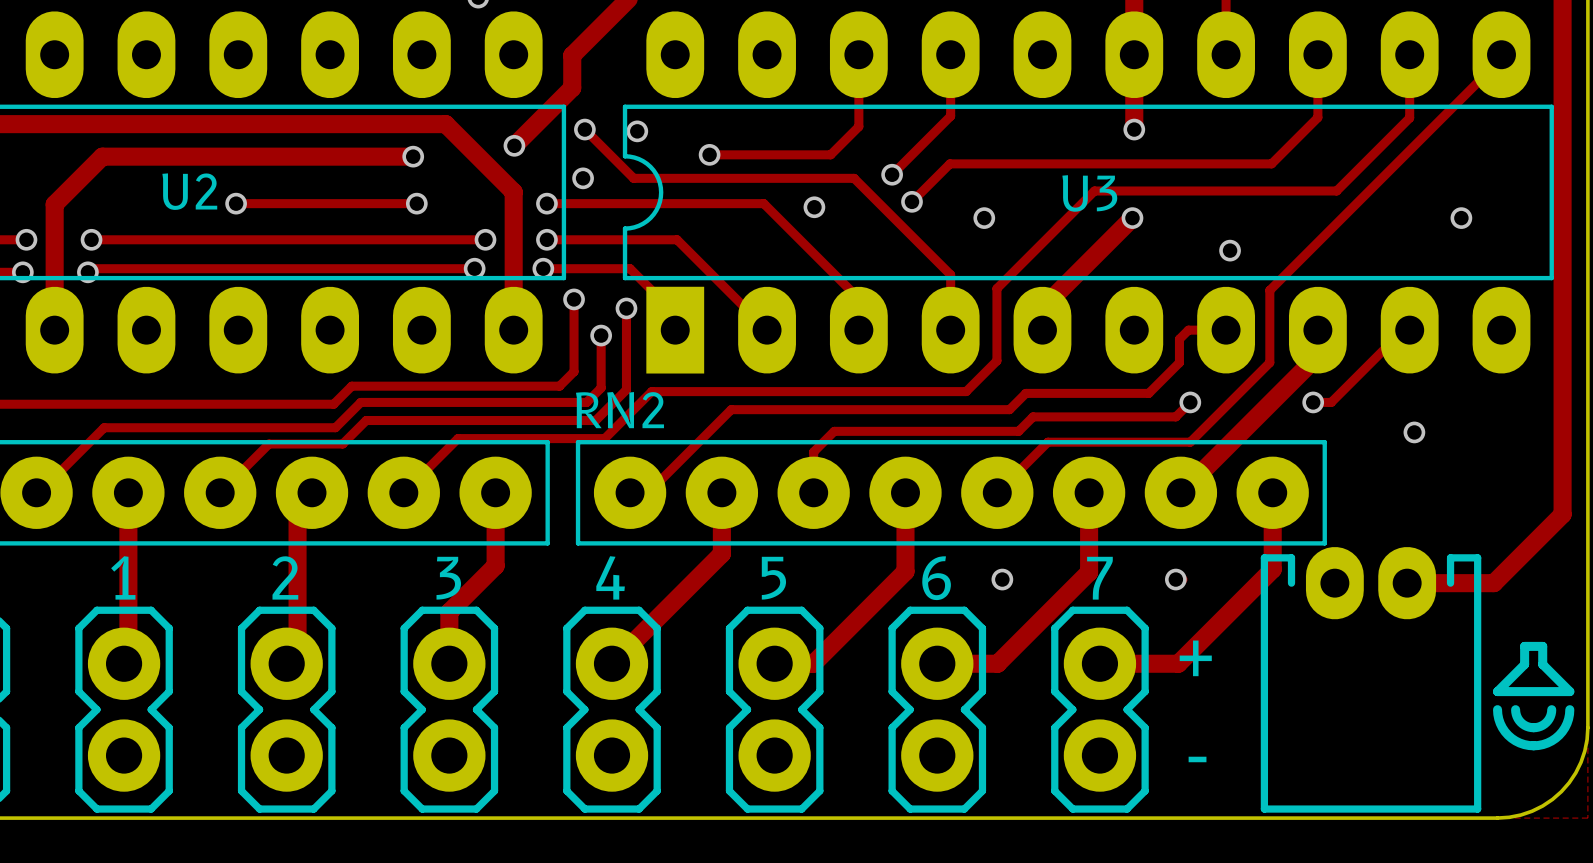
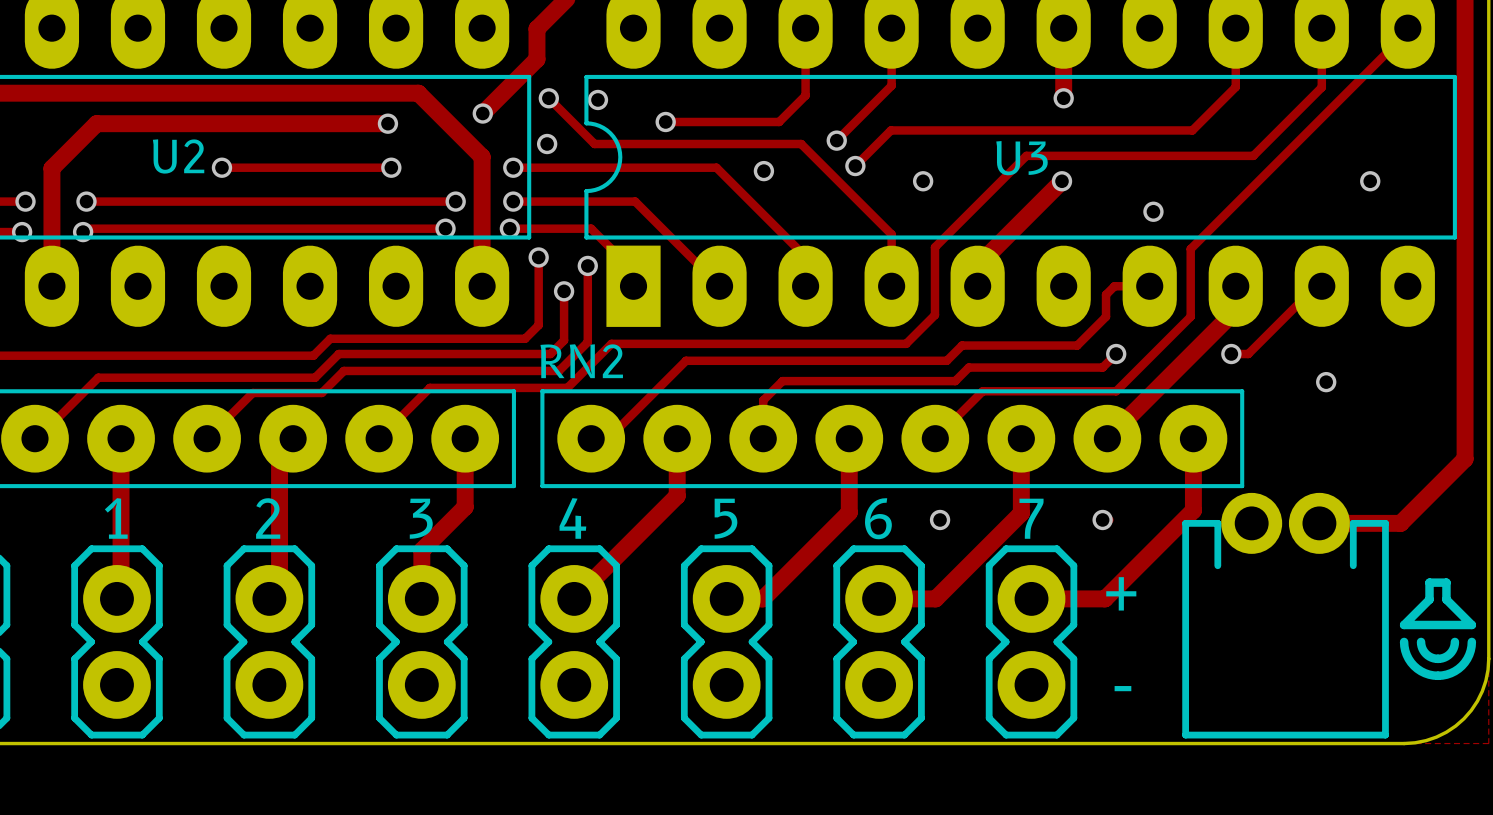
part footprint: [1260, 547, 1482, 813] -> [1182, 492, 1389, 739]

